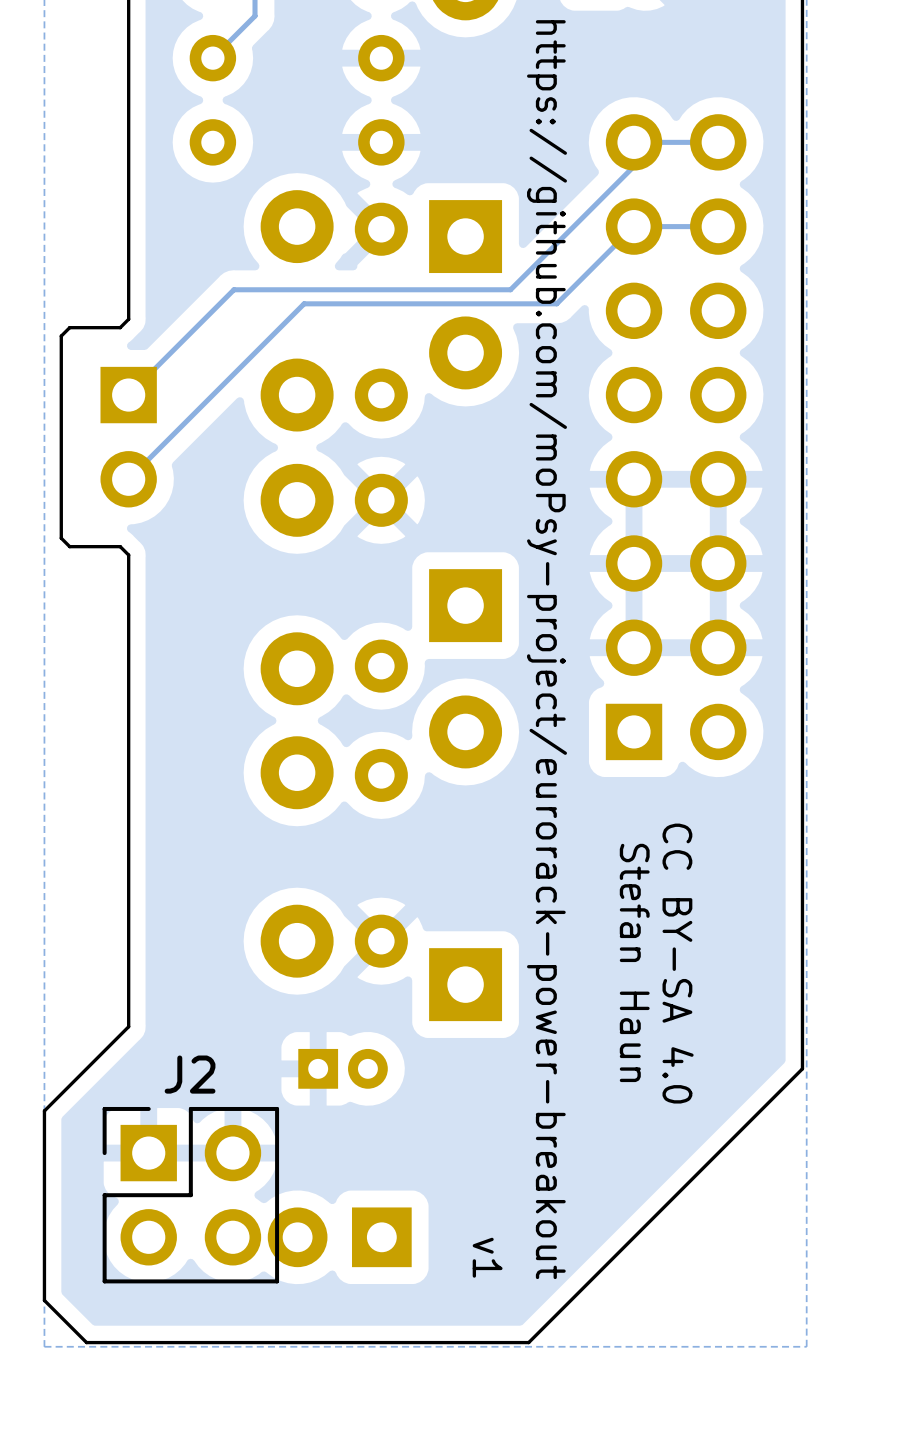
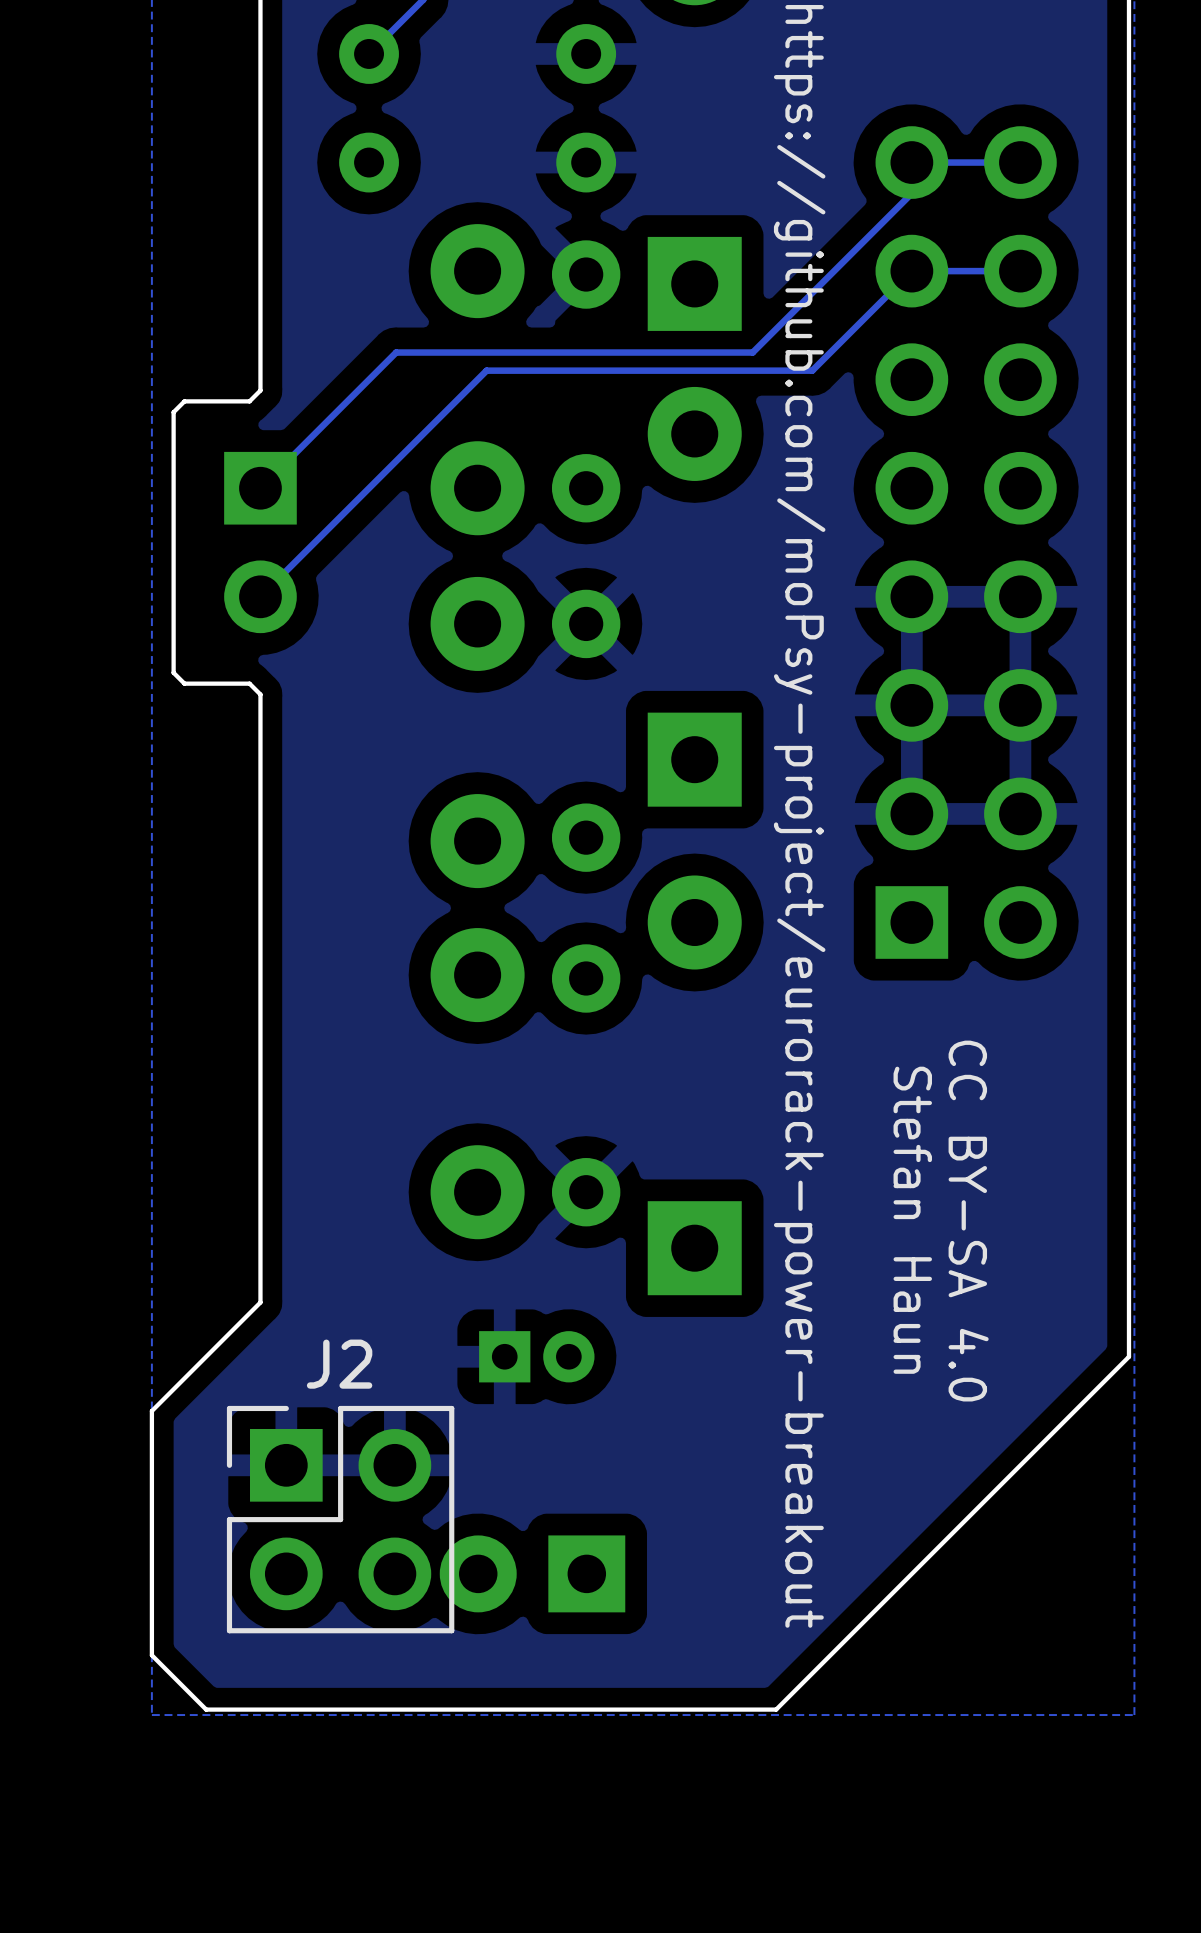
text: v1 (487, 1257) -> none

